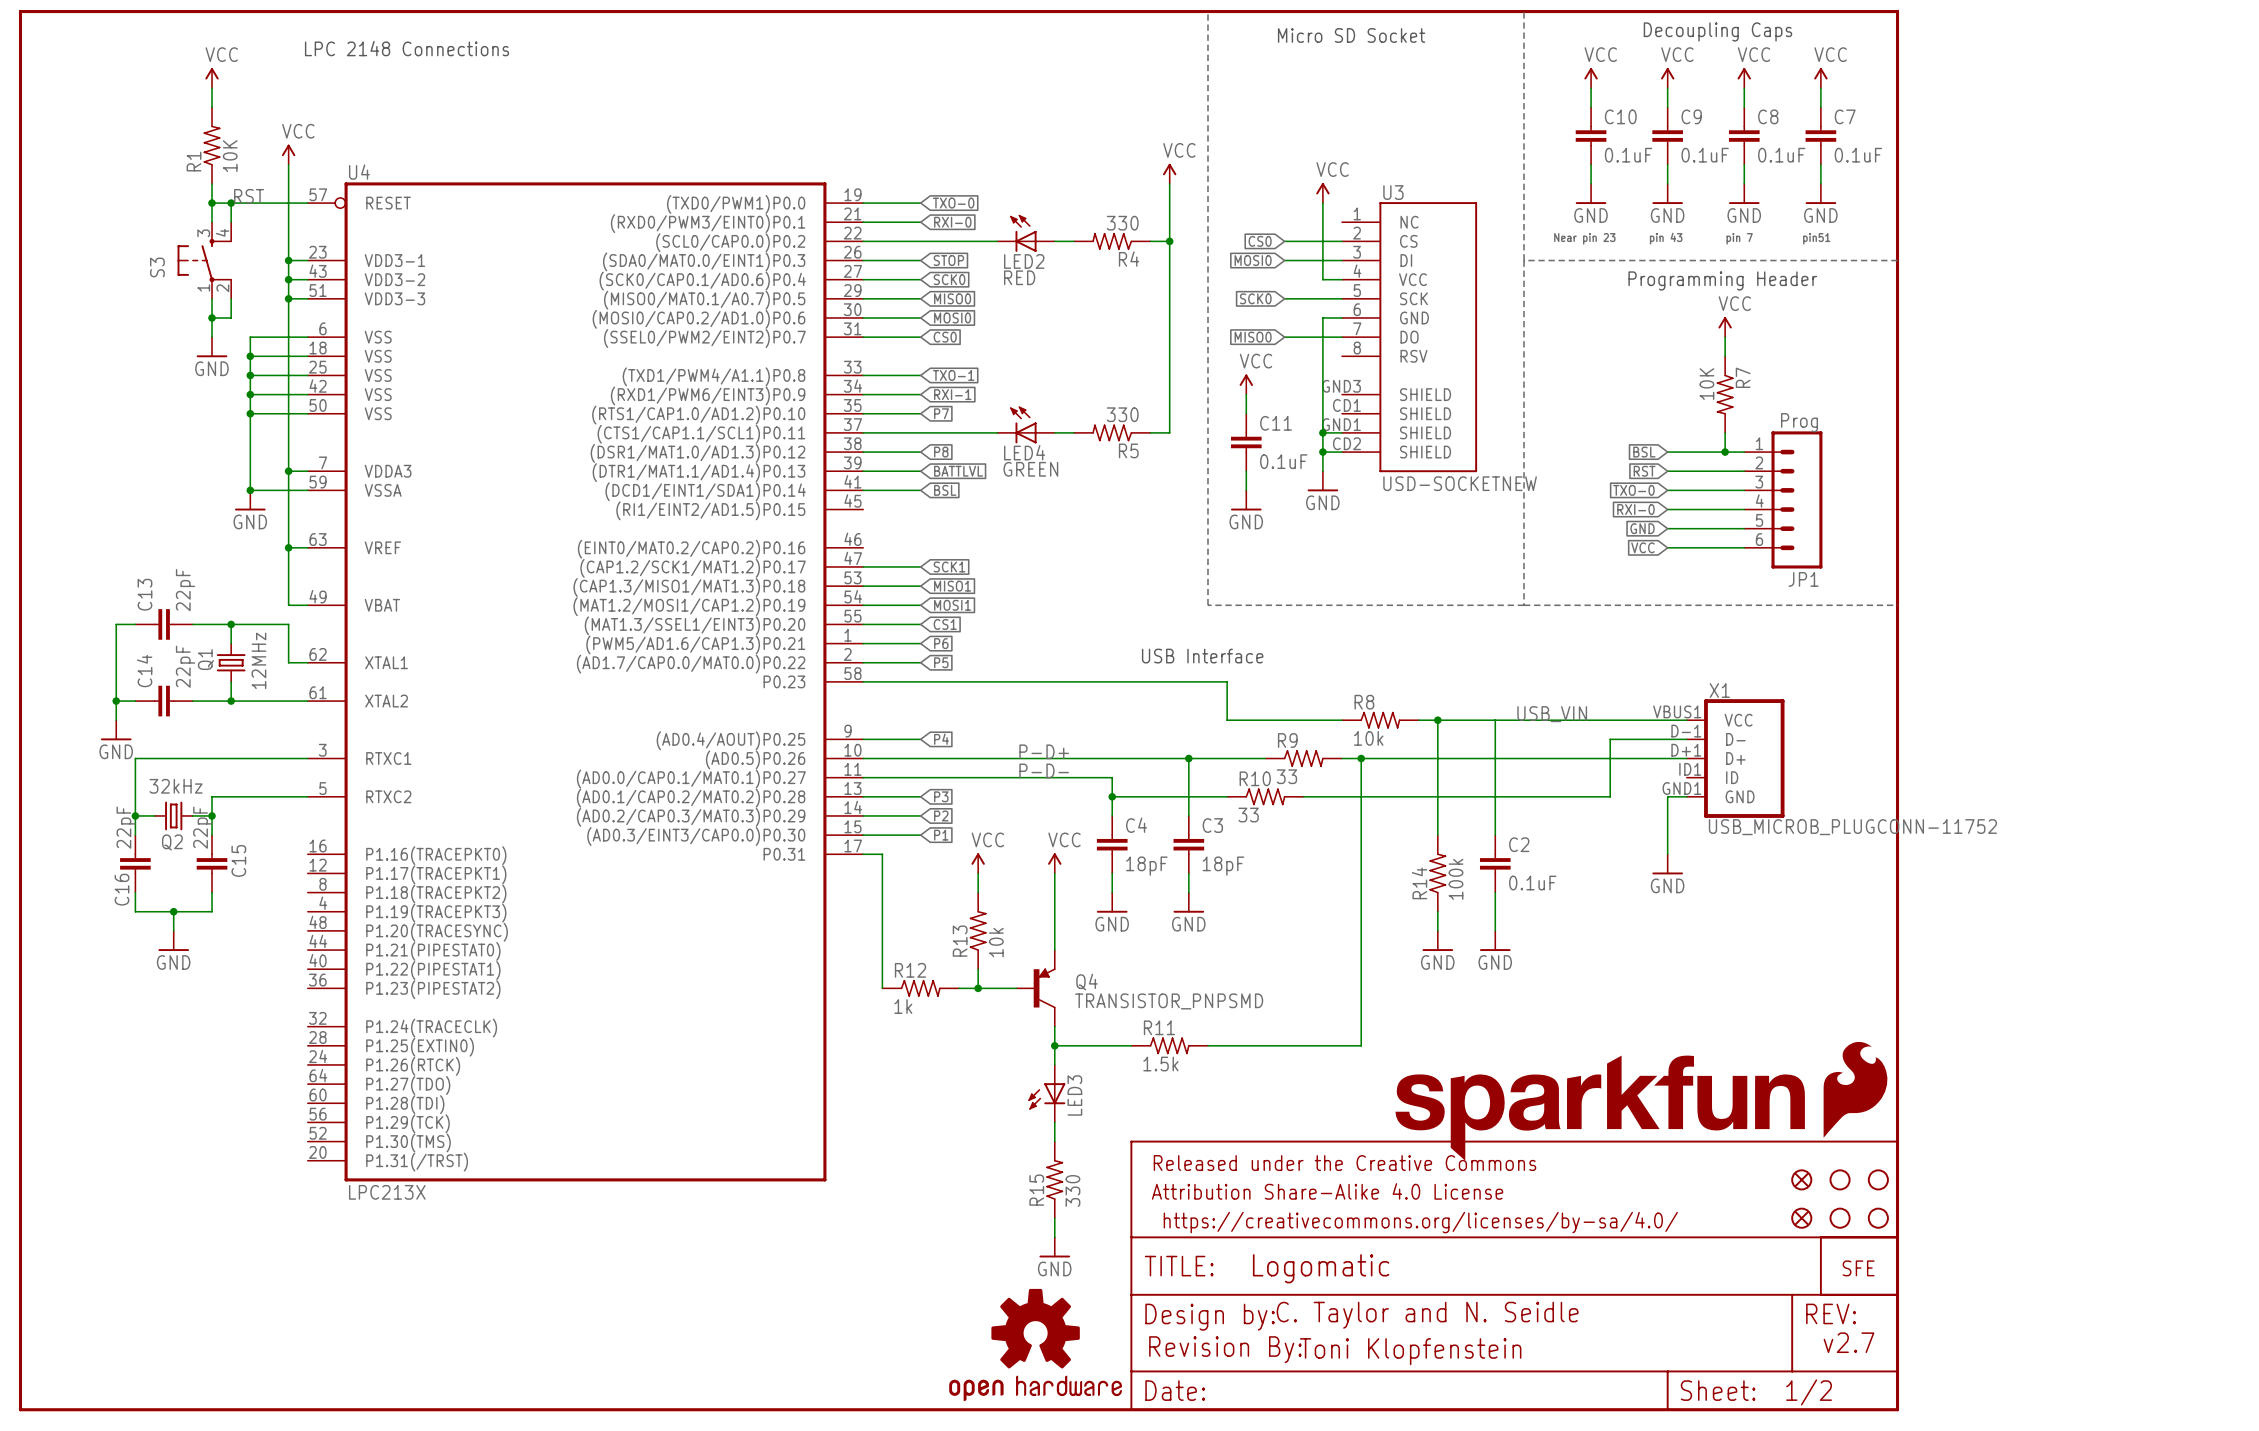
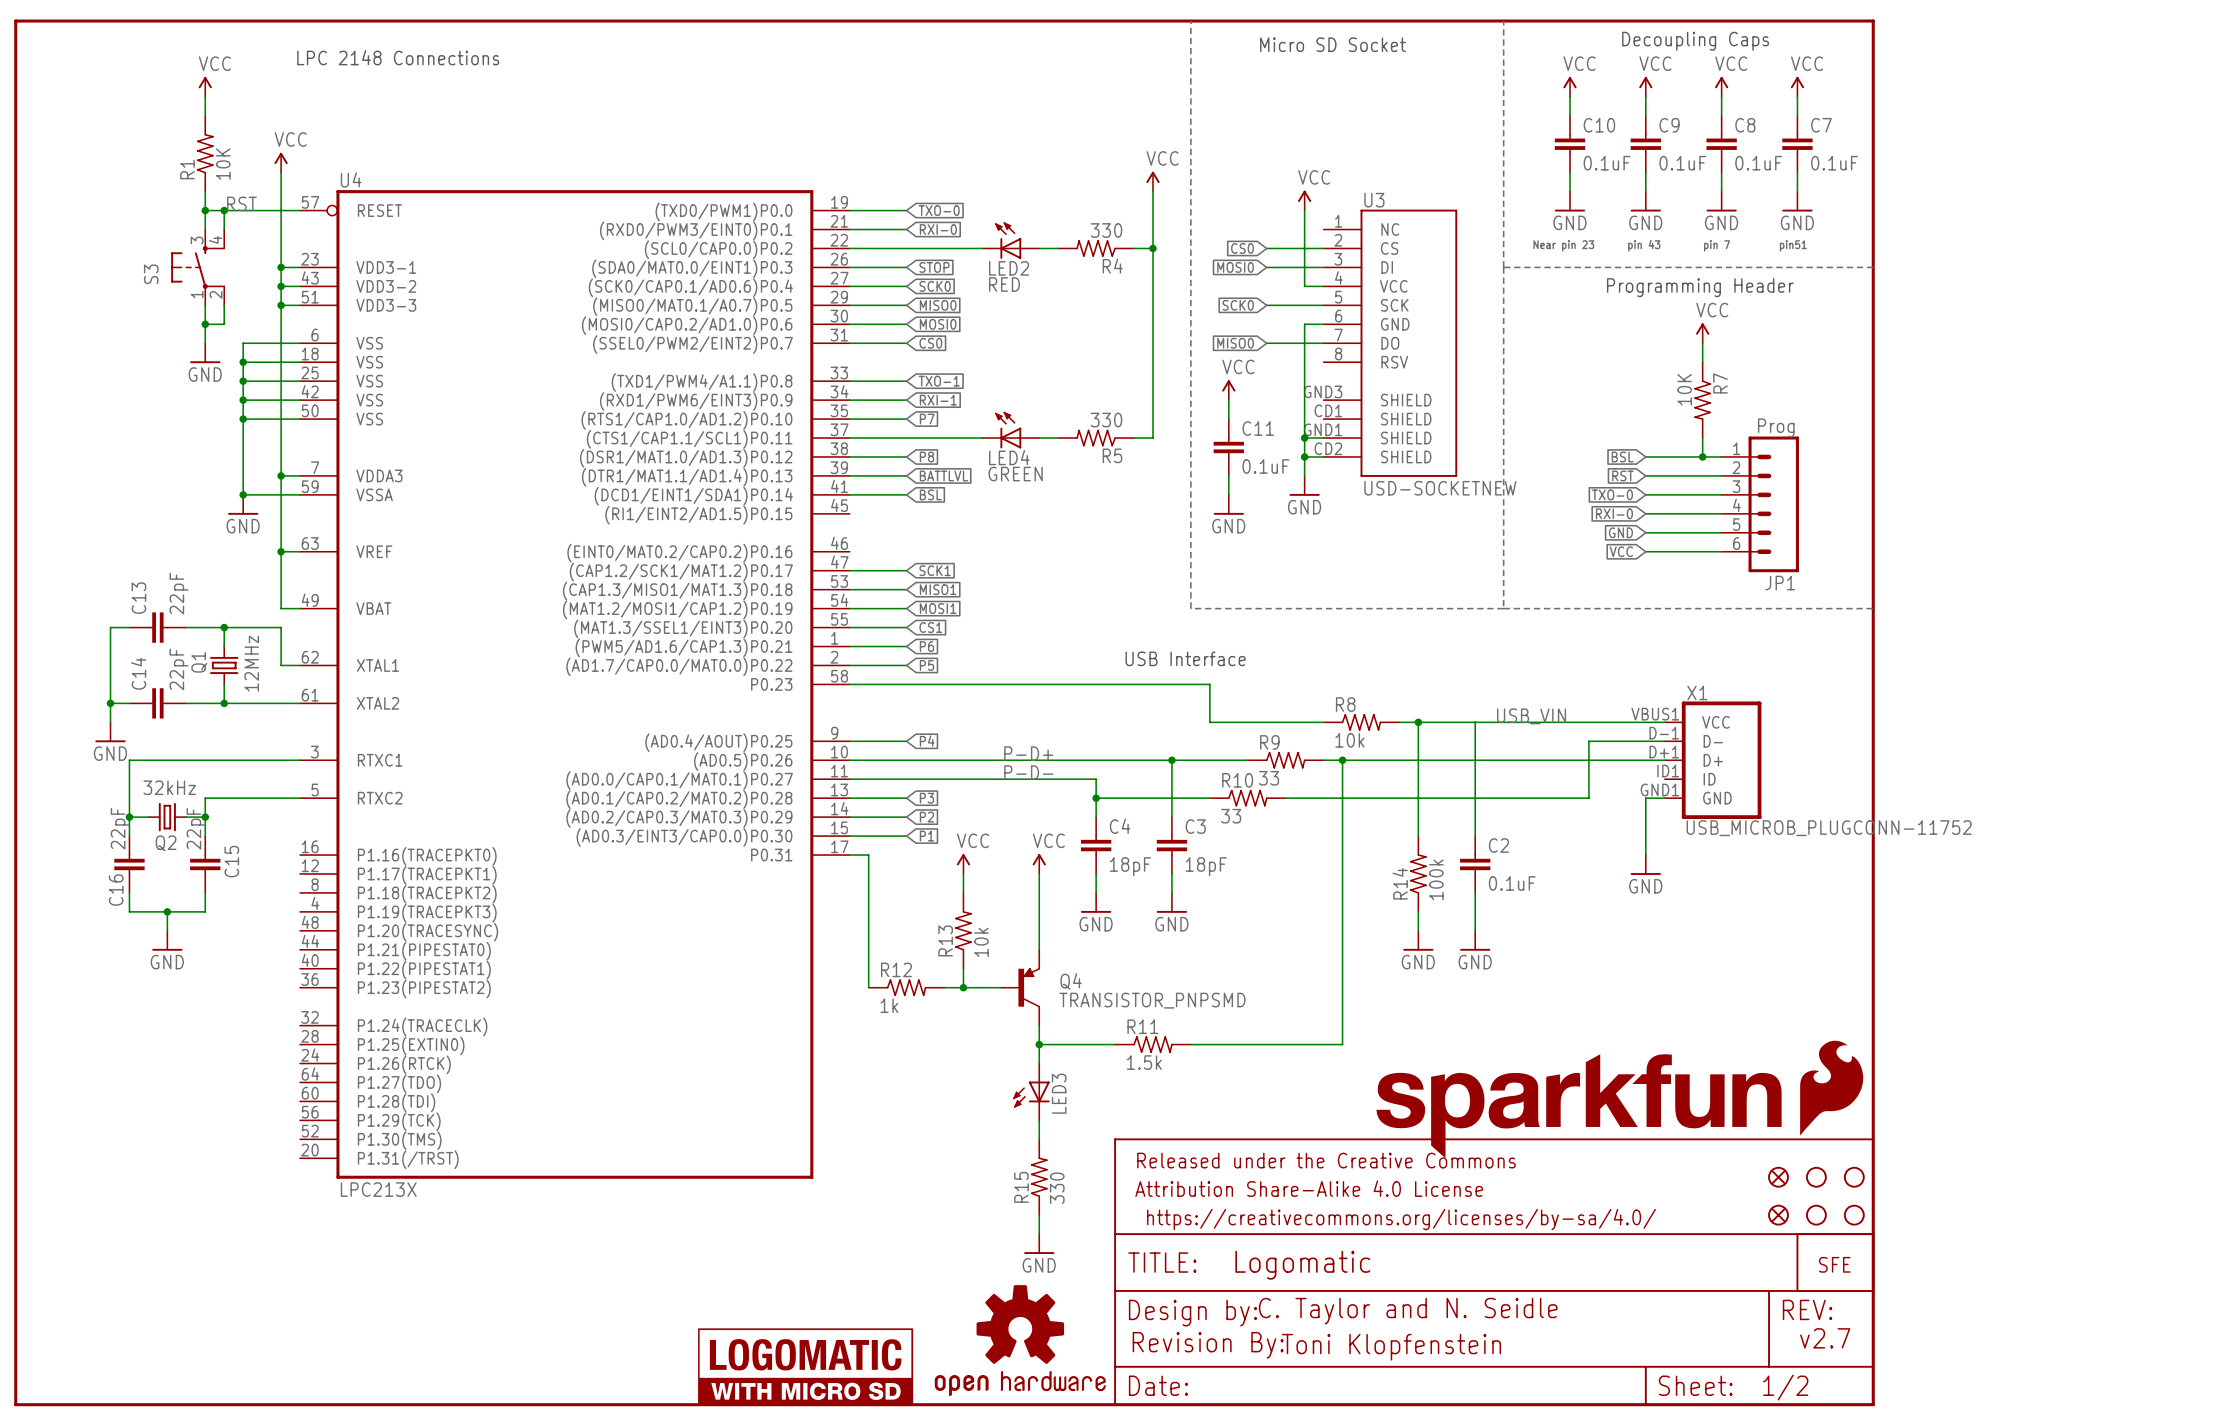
part: none -> (805, 1366)

